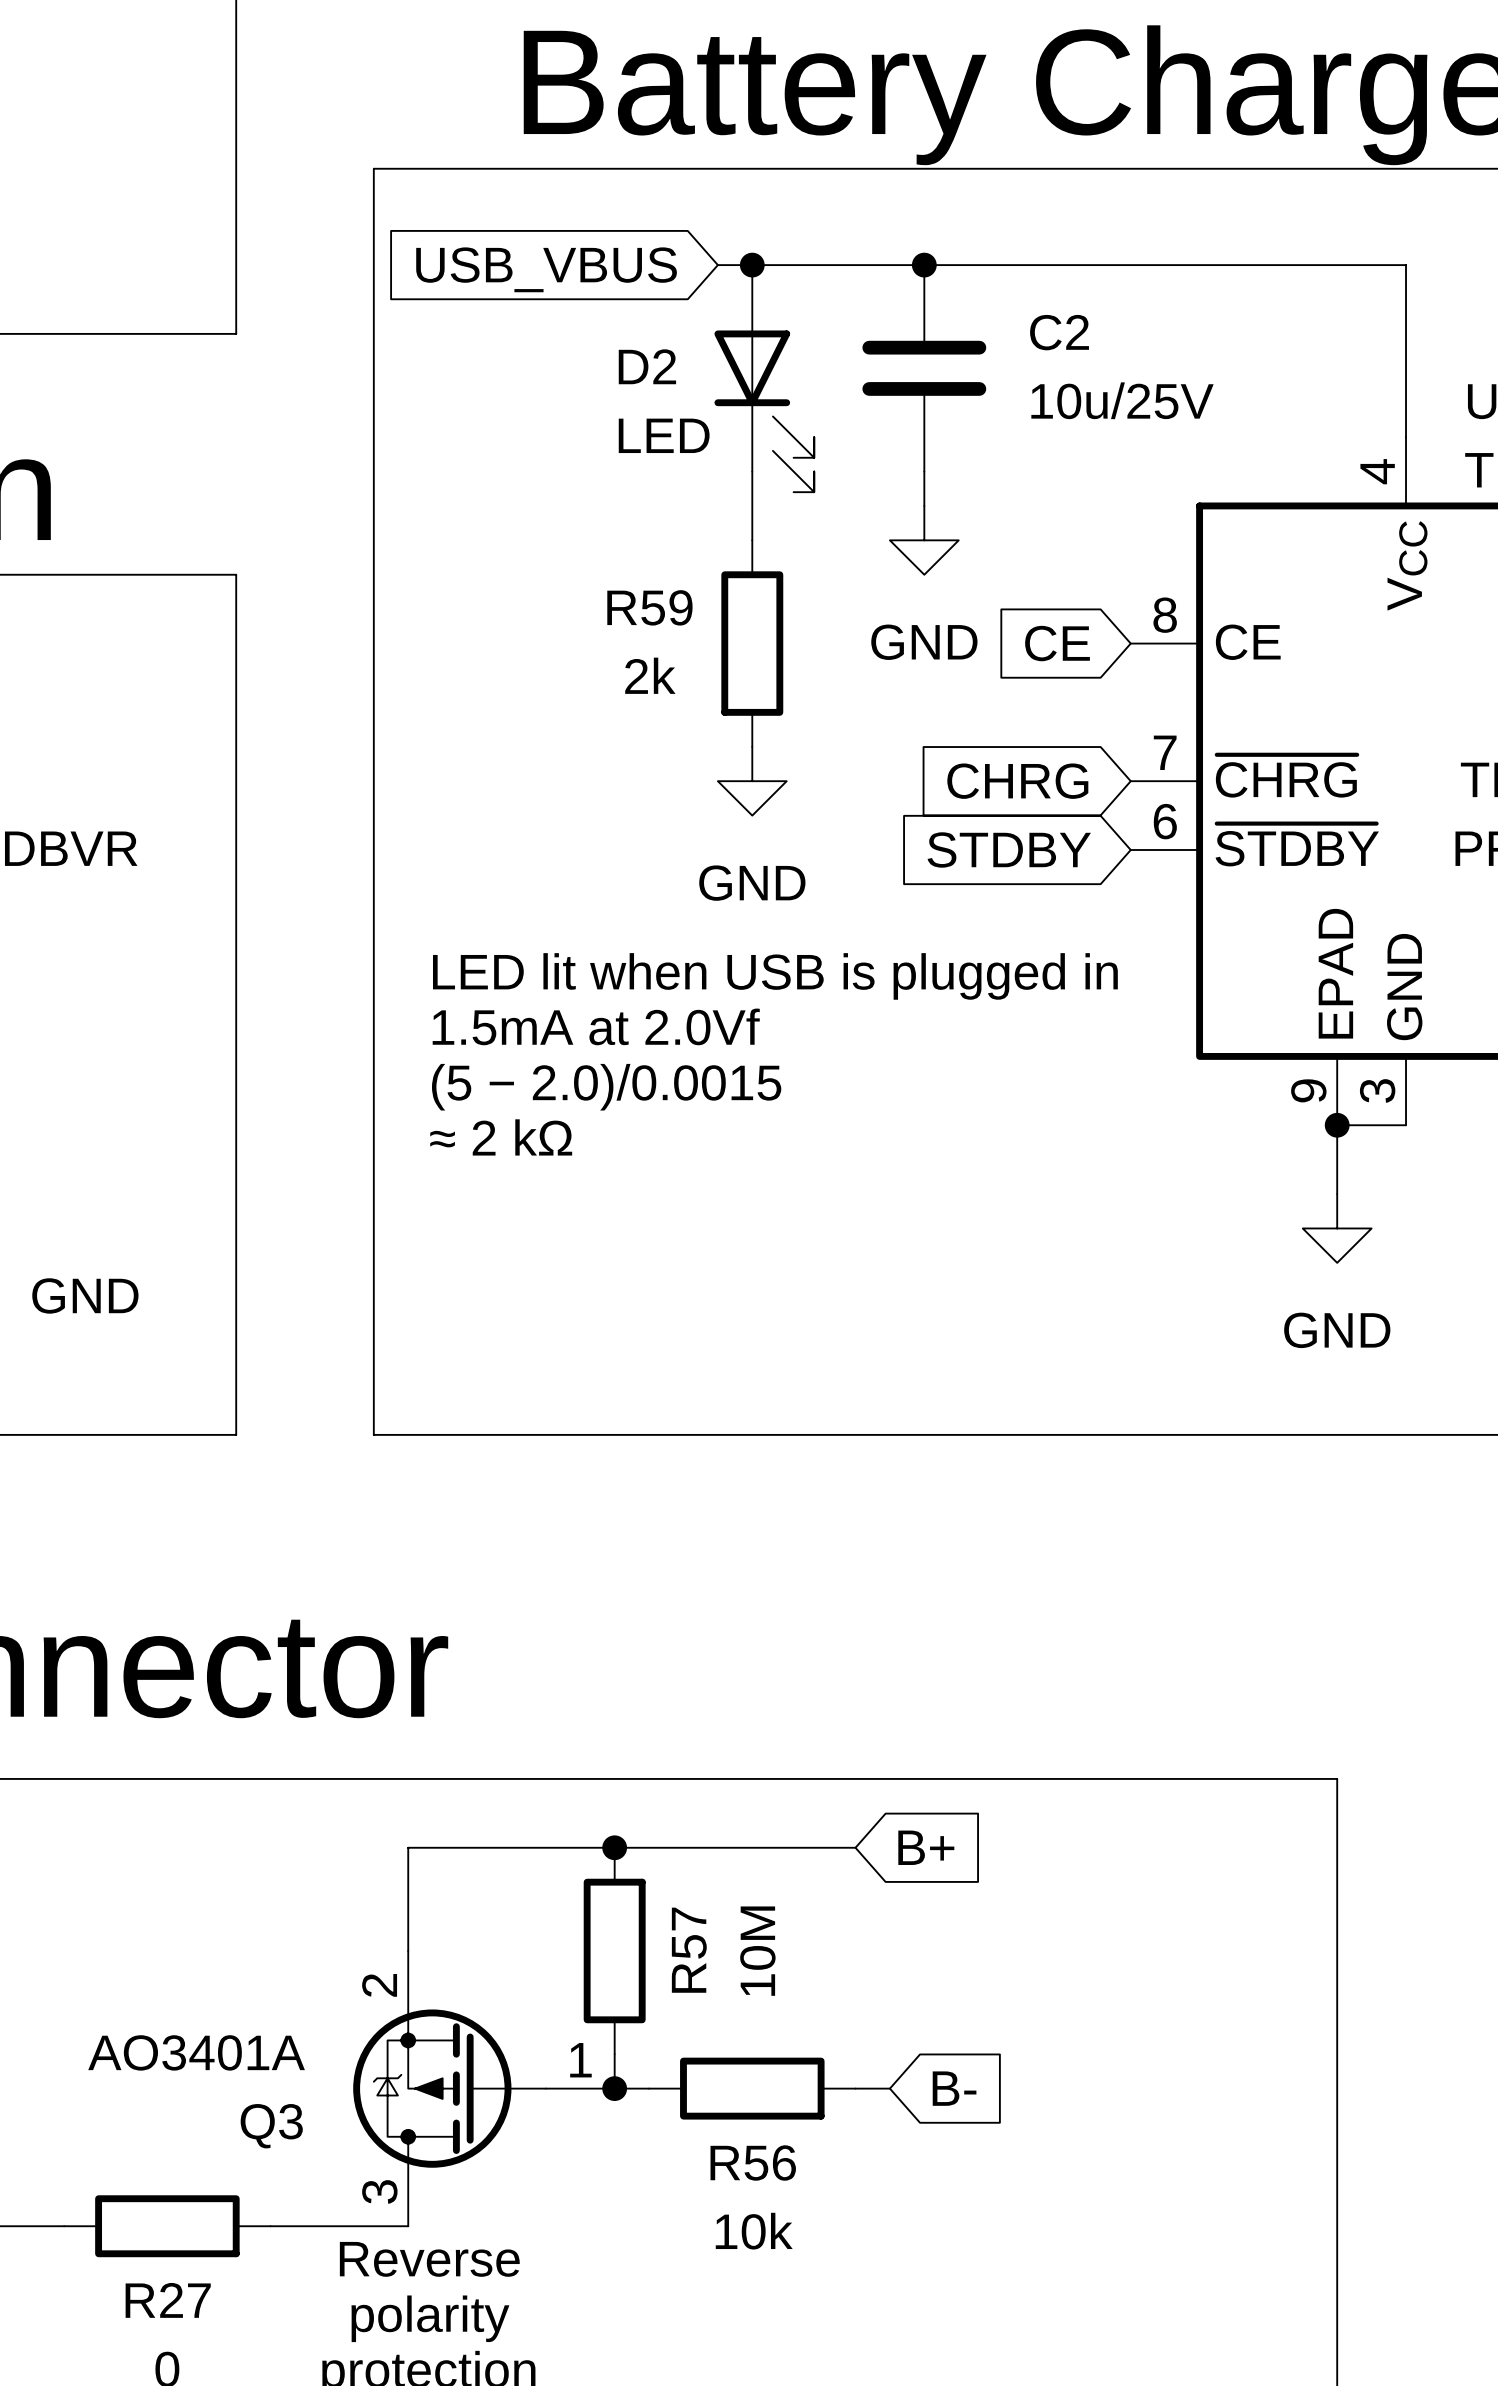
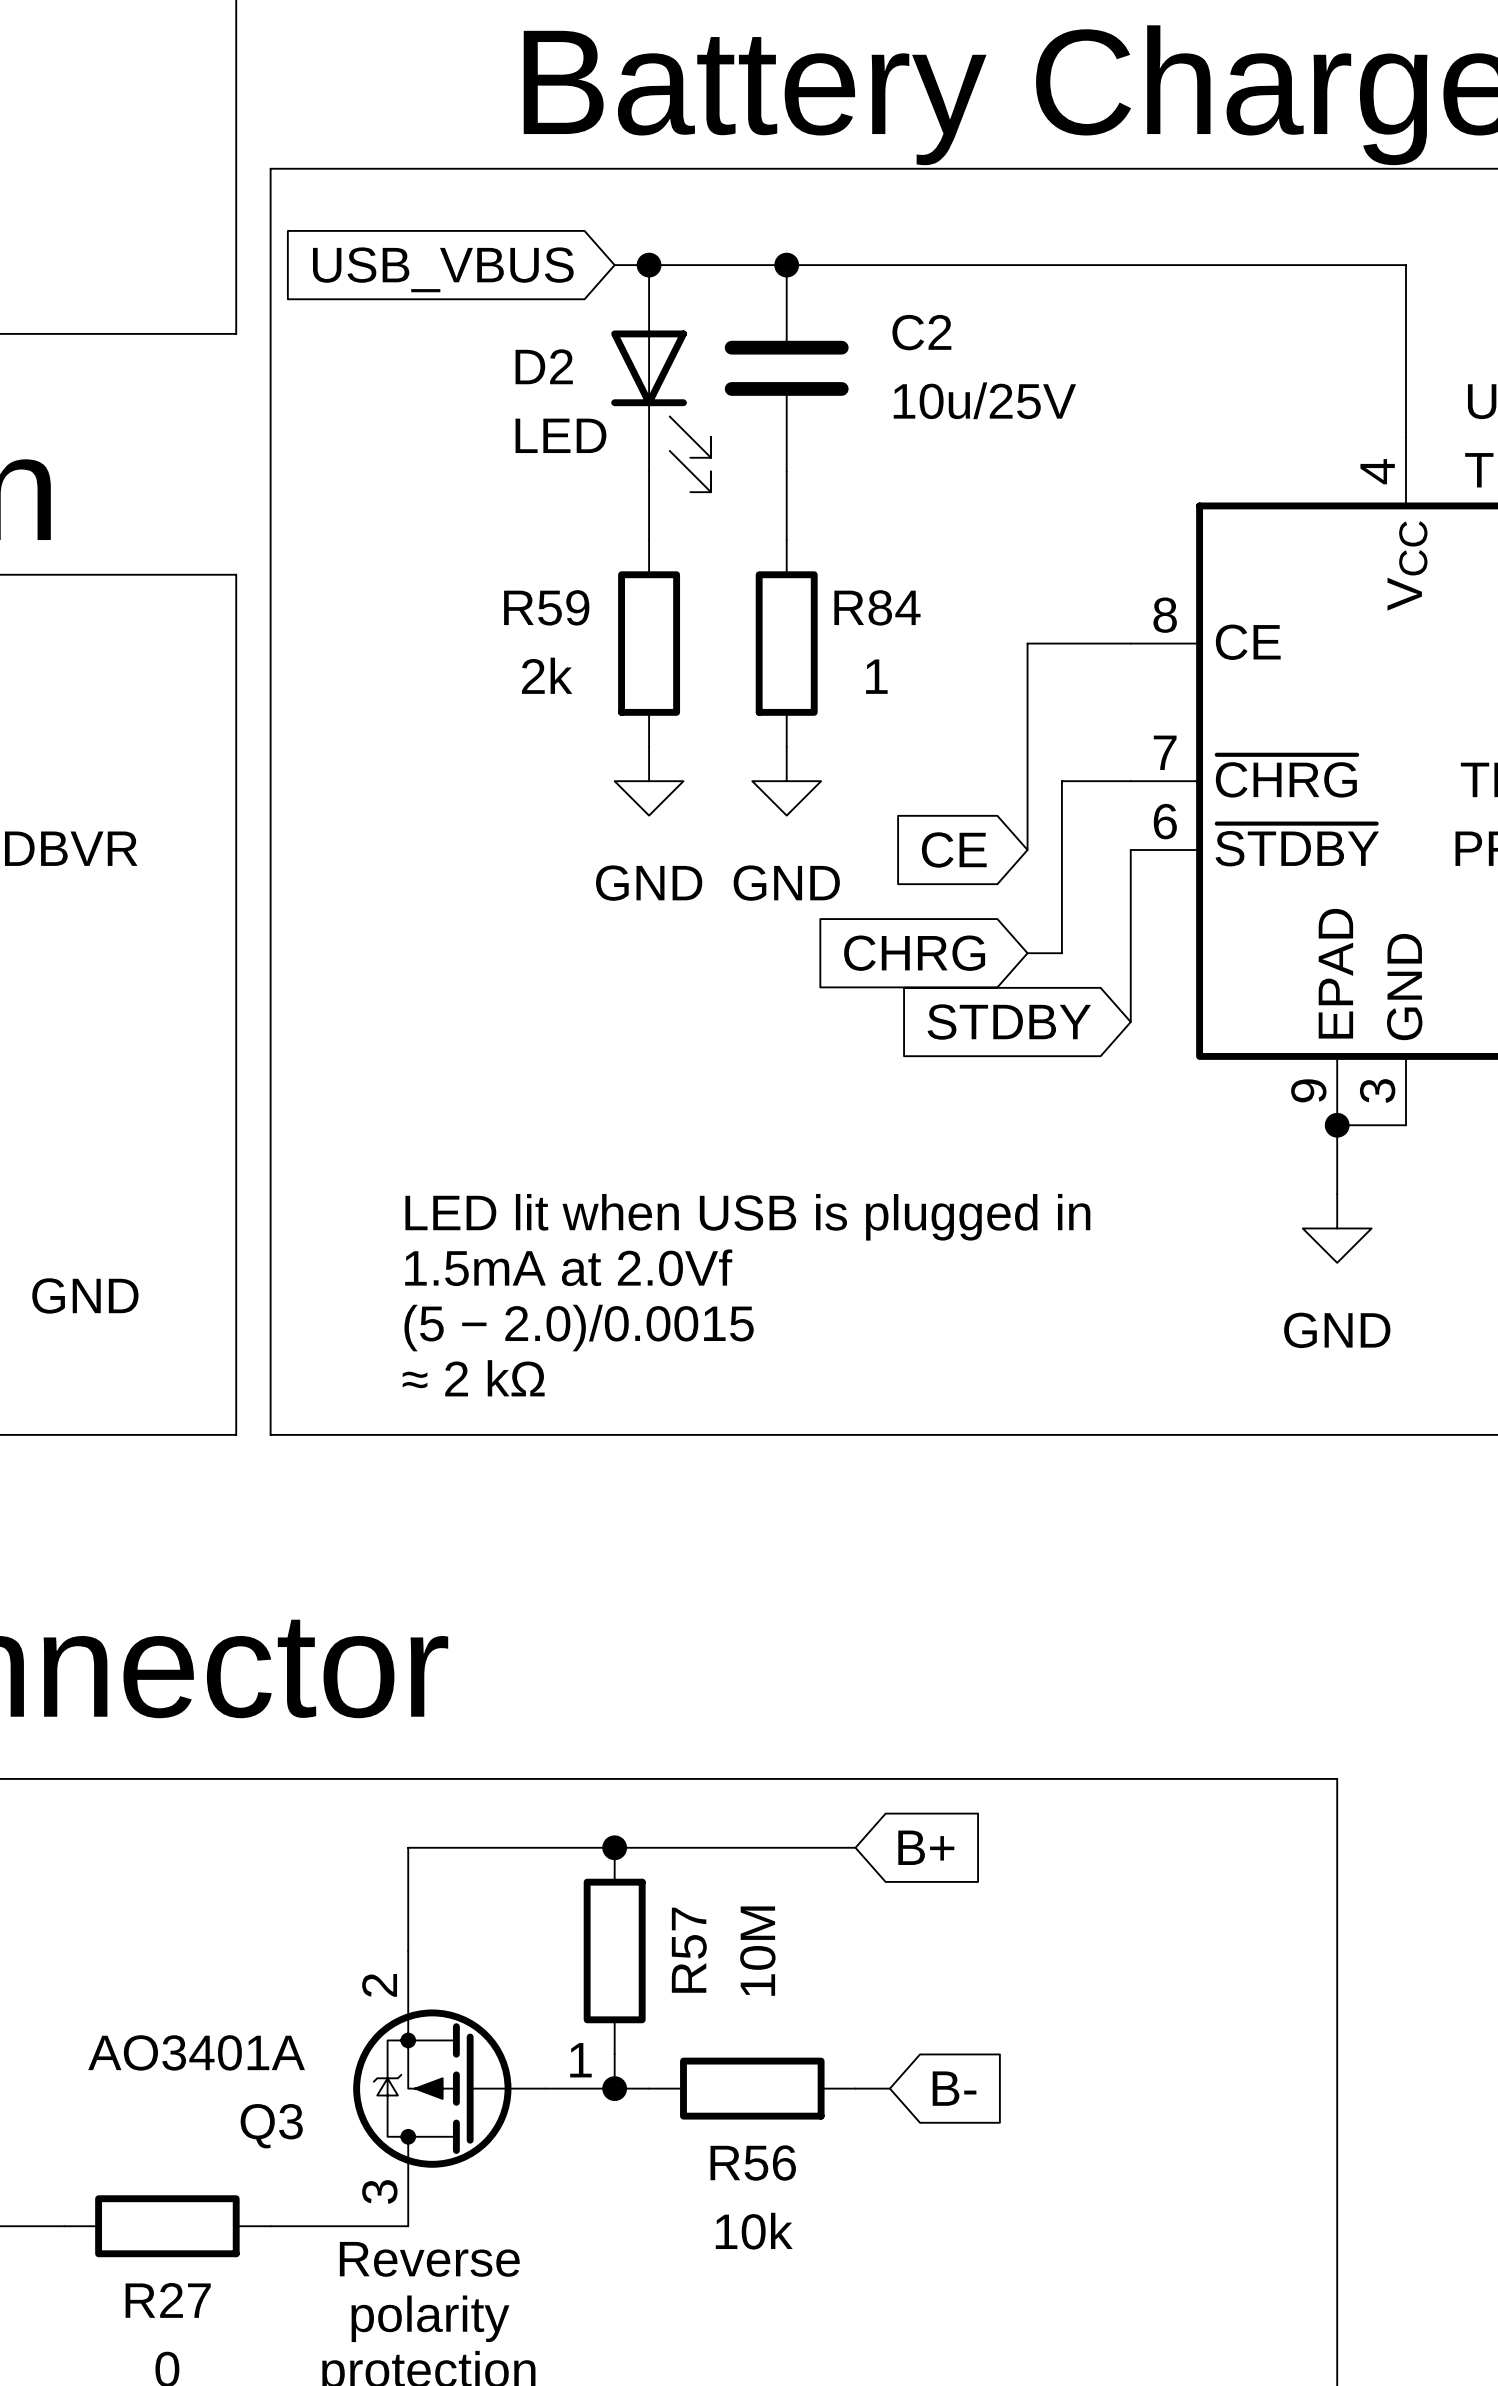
line: (373, 168) (373, 1434) -> (373, 168) (270, 168) (270, 1434) (373, 1434)
wire: none -> (614, 265) (717, 265)
junction: none -> (649, 265)
junction position: (752, 265) -> (786, 265)
junction: (924, 265) -> none
global label position: USB_VBUS (546, 269) -> USB_VBUS (443, 269)
C2 position: (924, 368) -> (786, 368)
D2 position: (764, 378) -> (661, 378)
wire: none -> (649, 471) (649, 540)
wire: (752, 471) (752, 540) -> (786, 471) (786, 540)
wire: (924, 471) (924, 505) -> none
power symbol: GND (924, 540) -> none
R59 position: (752, 643) -> (649, 643)
R84: none -> 1 (786, 643)
global label position: CE (1057, 643) -> CE (954, 849)
wire: none -> (1130, 643) (1027, 643) (1027, 850)
power symbol: none -> GND (649, 781)
power symbol position: GND (752, 781) -> GND (786, 781)
global label position: CHRG (1017, 781) -> CHRG (914, 953)
wire: none -> (1130, 781) (1061, 781) (1061, 953) (1027, 953)
global label position: STDBY (1009, 849) -> STDBY (1009, 1022)
wire: none -> (1130, 850) (1130, 1022)
text position: LED lit when USB is plugged in (775, 976) -> LED lit when USB is plugged in (747, 1217)
text position: 1.5mA at 2.0Vf (596, 1026) -> 1.5mA at 2.0Vf (568, 1267)
text position: (5 − 2.0)/0.0015 (606, 1087) -> (5 − 2.0)/0.0015 (579, 1328)
text position: ≈ 2 kΩ (501, 1137) -> ≈ 2 kΩ (473, 1378)

